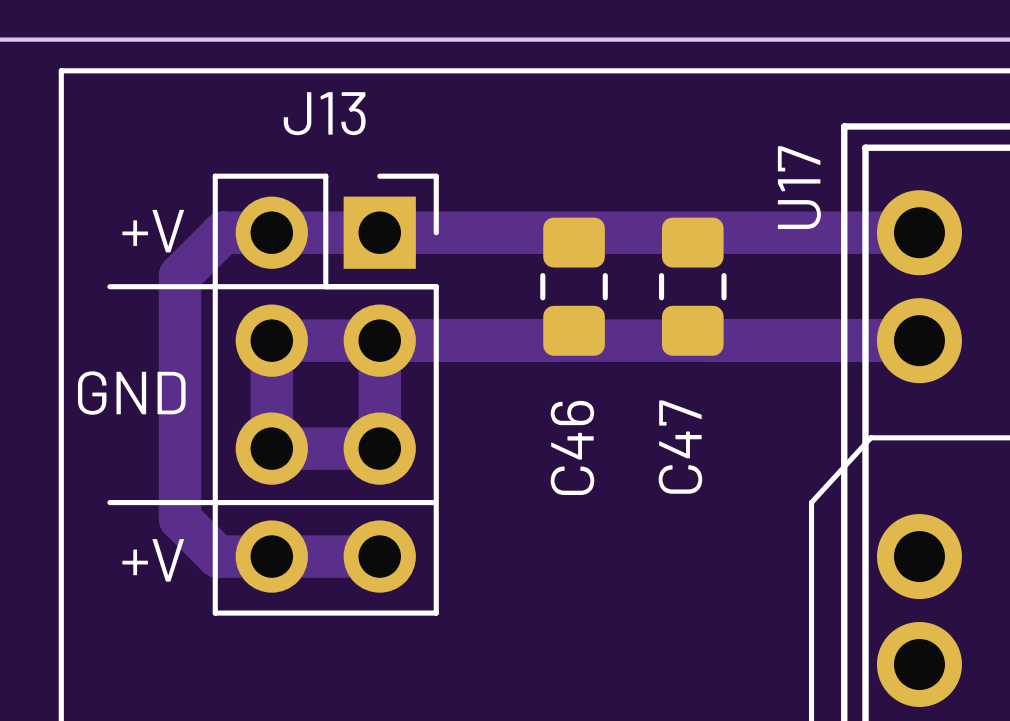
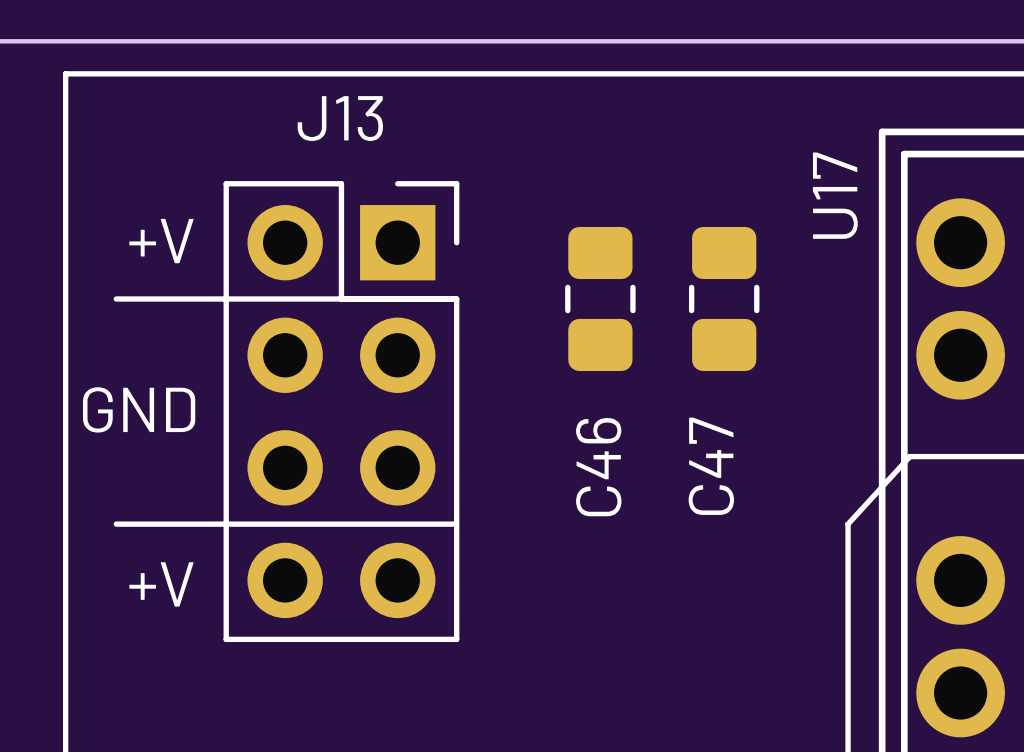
track: (918, 231) (223, 232) (180, 275) (180, 518) (217, 556) (379, 556) -> none
track: (909, 330) (919, 340) (271, 340) (271, 448) (379, 448) (379, 340) -> none

